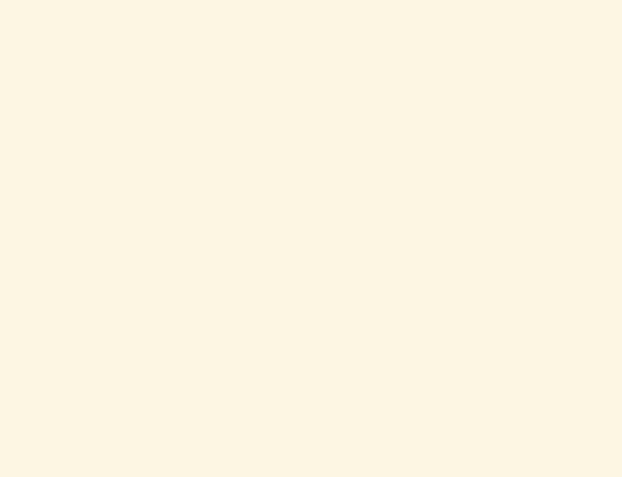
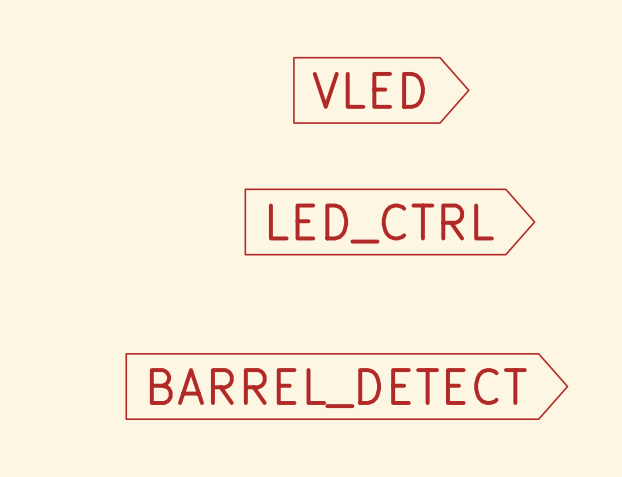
global label: none -> VLED (368, 90)
global label: none -> LED_CTRL (381, 223)
global label: none -> BARREL_DETECT (338, 388)

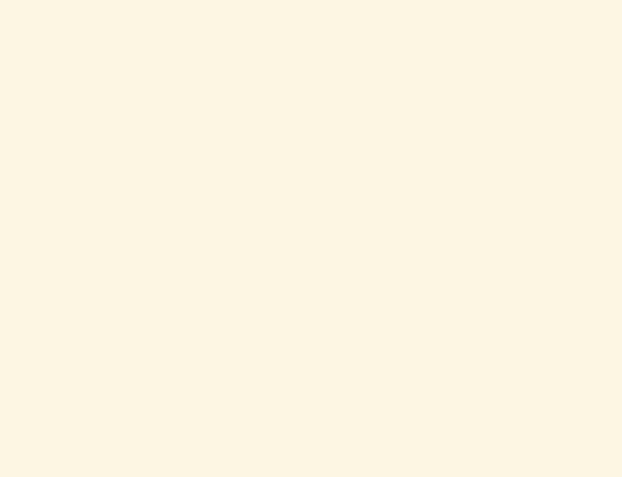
global label: VLED (368, 90) -> none
global label: LED_CTRL (381, 223) -> none
global label: BARREL_DETECT (338, 388) -> none

